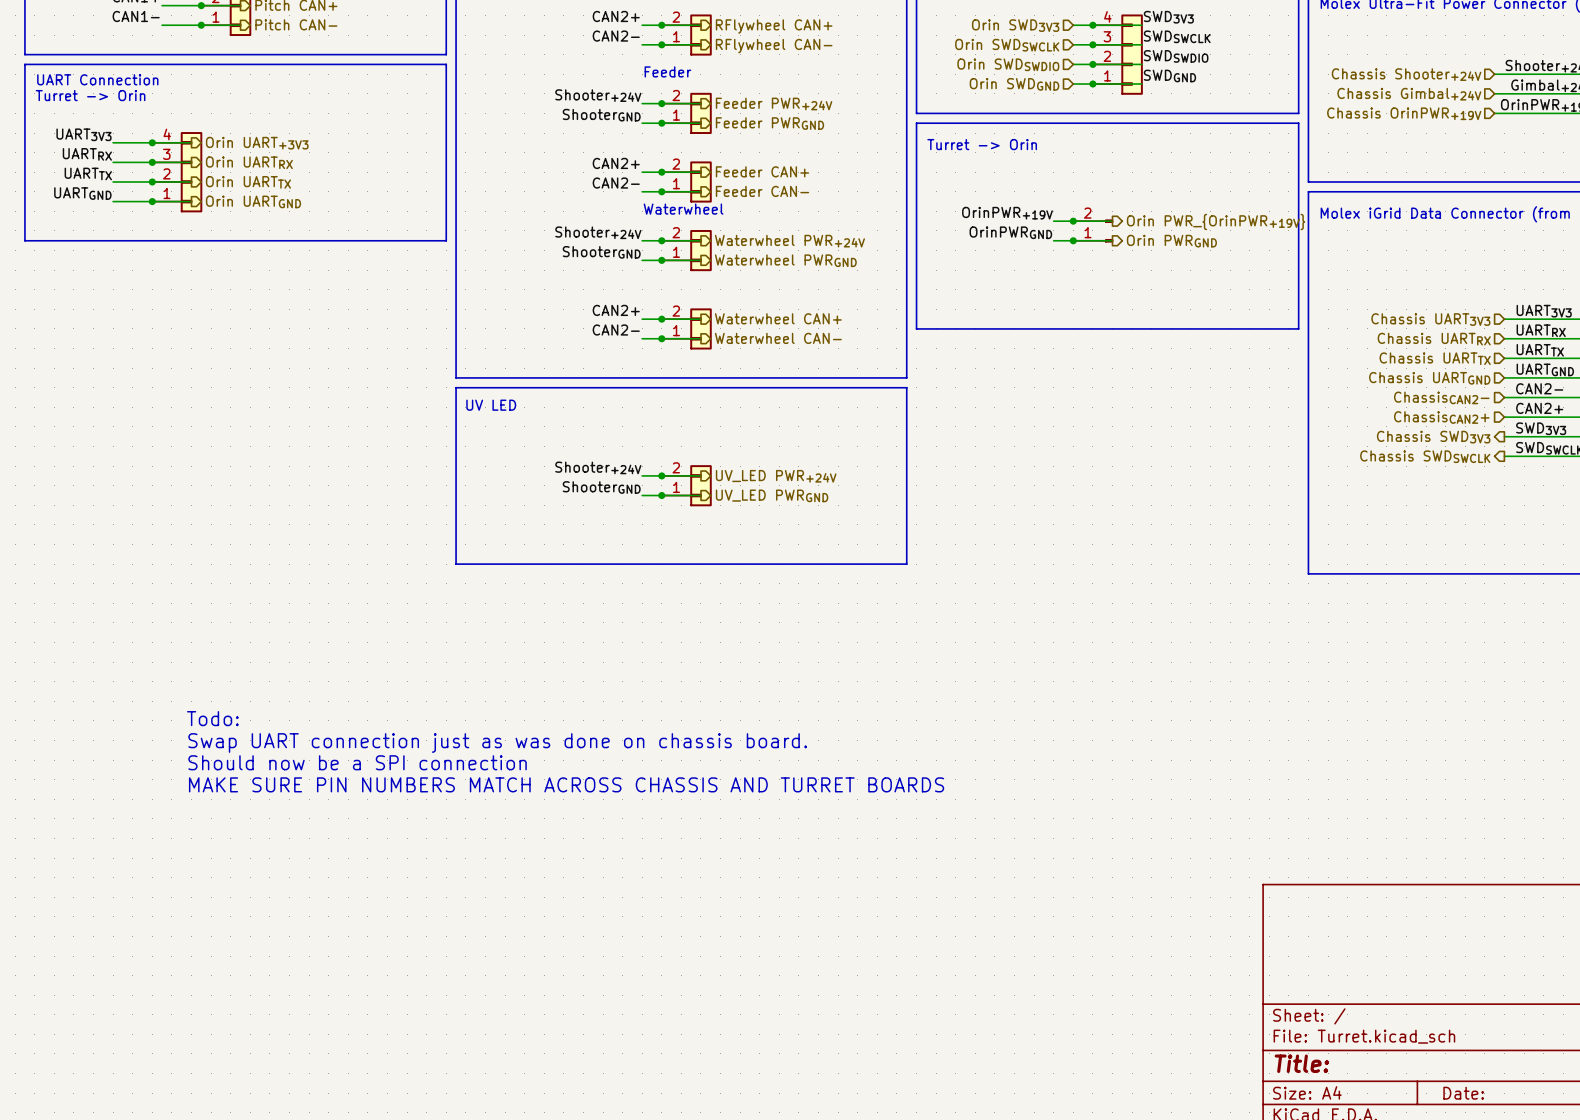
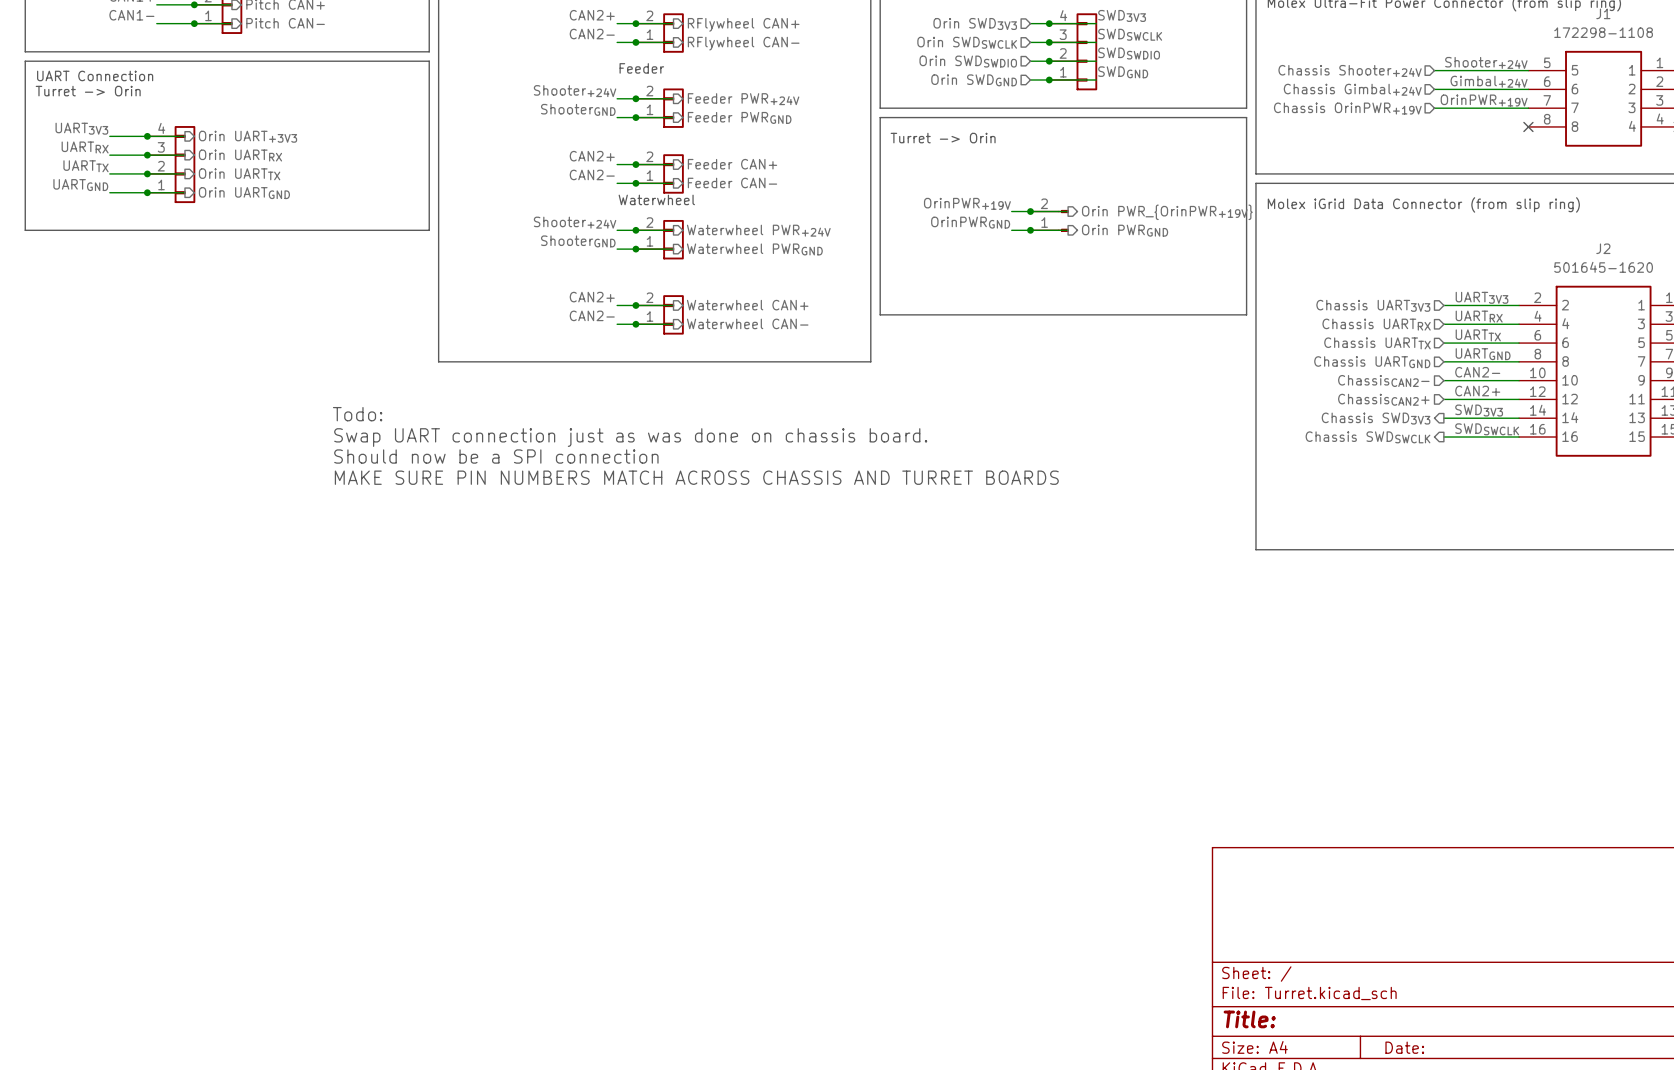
line: (456, 387) (906, 387) (906, 564) (456, 564) (456, 387) -> none
text: UV LED (491, 405) -> none
text: none -> Todo: (357, 414)
text: none -> Swap UART connection just as was done on chassis board. (630, 437)
label: Shooter+24V (598, 467) -> none
wire: (642, 475) (700, 475) -> none
junction: (661, 475) -> none
text: none -> Should now be a SPI connection (496, 456)
hierarchical label: UV_LED PWR+24V (776, 476) -> none
part: (686, 485) -> none
label: ShooterGND (601, 487) -> none
wire: (642, 495) (700, 495) -> none
junction: (661, 495) -> none
hierarchical label: UV_LED PWRGND (772, 495) -> none
text: none -> MAKE SURE PIN NUMBERS MATCH ACROSS CHASSIS AND TURRET BOARDS (696, 477)
text: Todo: (212, 718) -> none
text: Swap UART connection just as was done on chassis board. (497, 742) -> none
text: Should now be a SPI connection (357, 762) -> none
text: MAKE SURE PIN NUMBERS MATCH ACROSS CHASSIS AND TURRET BOARDS (566, 784) -> none

